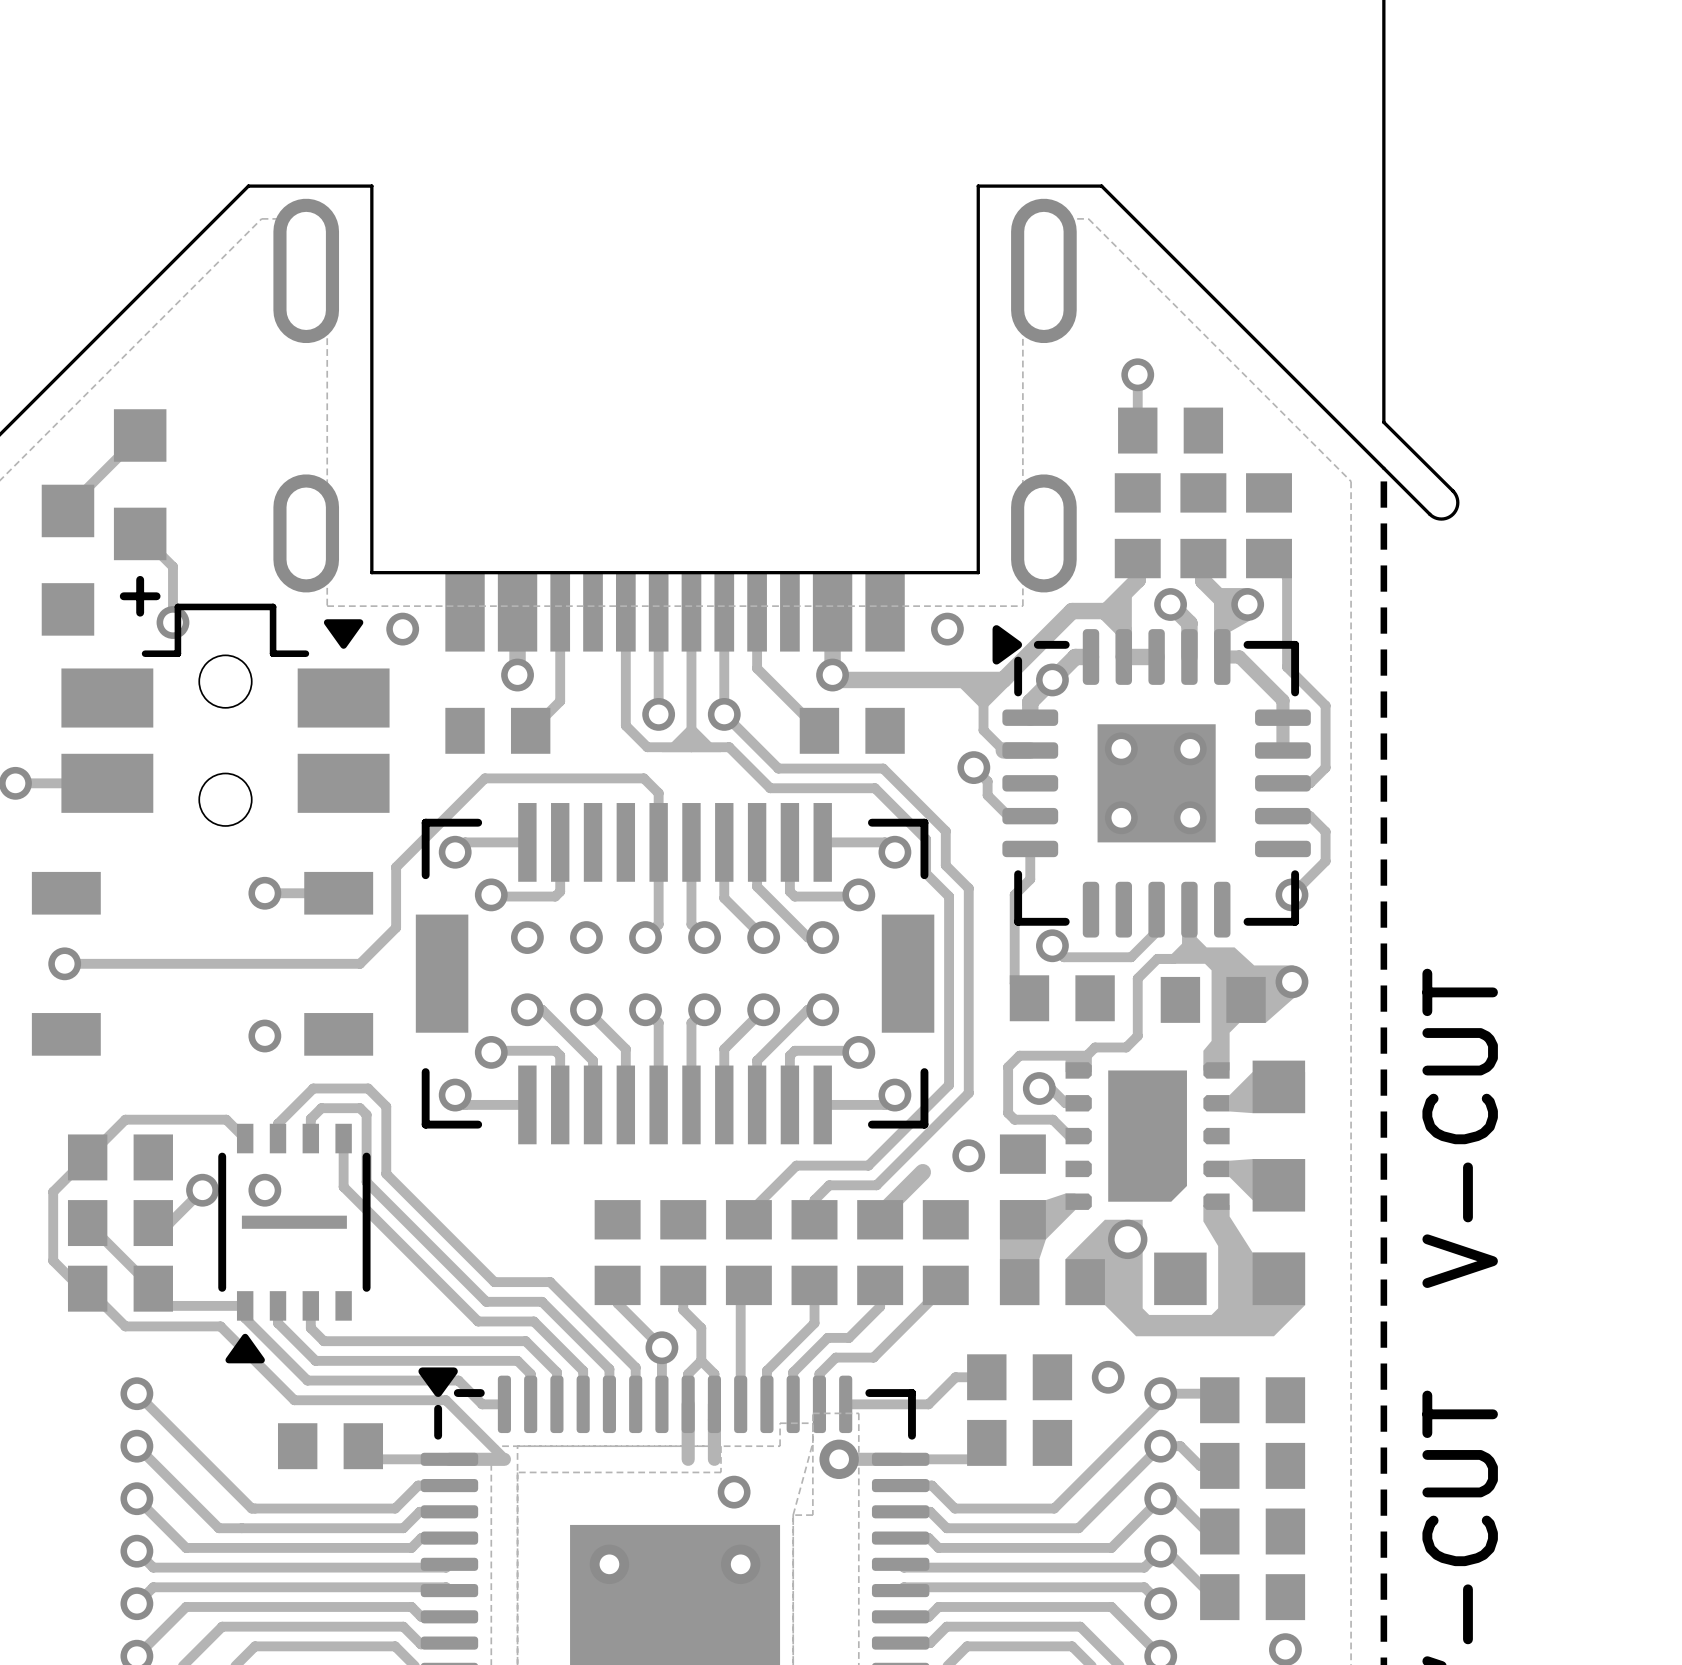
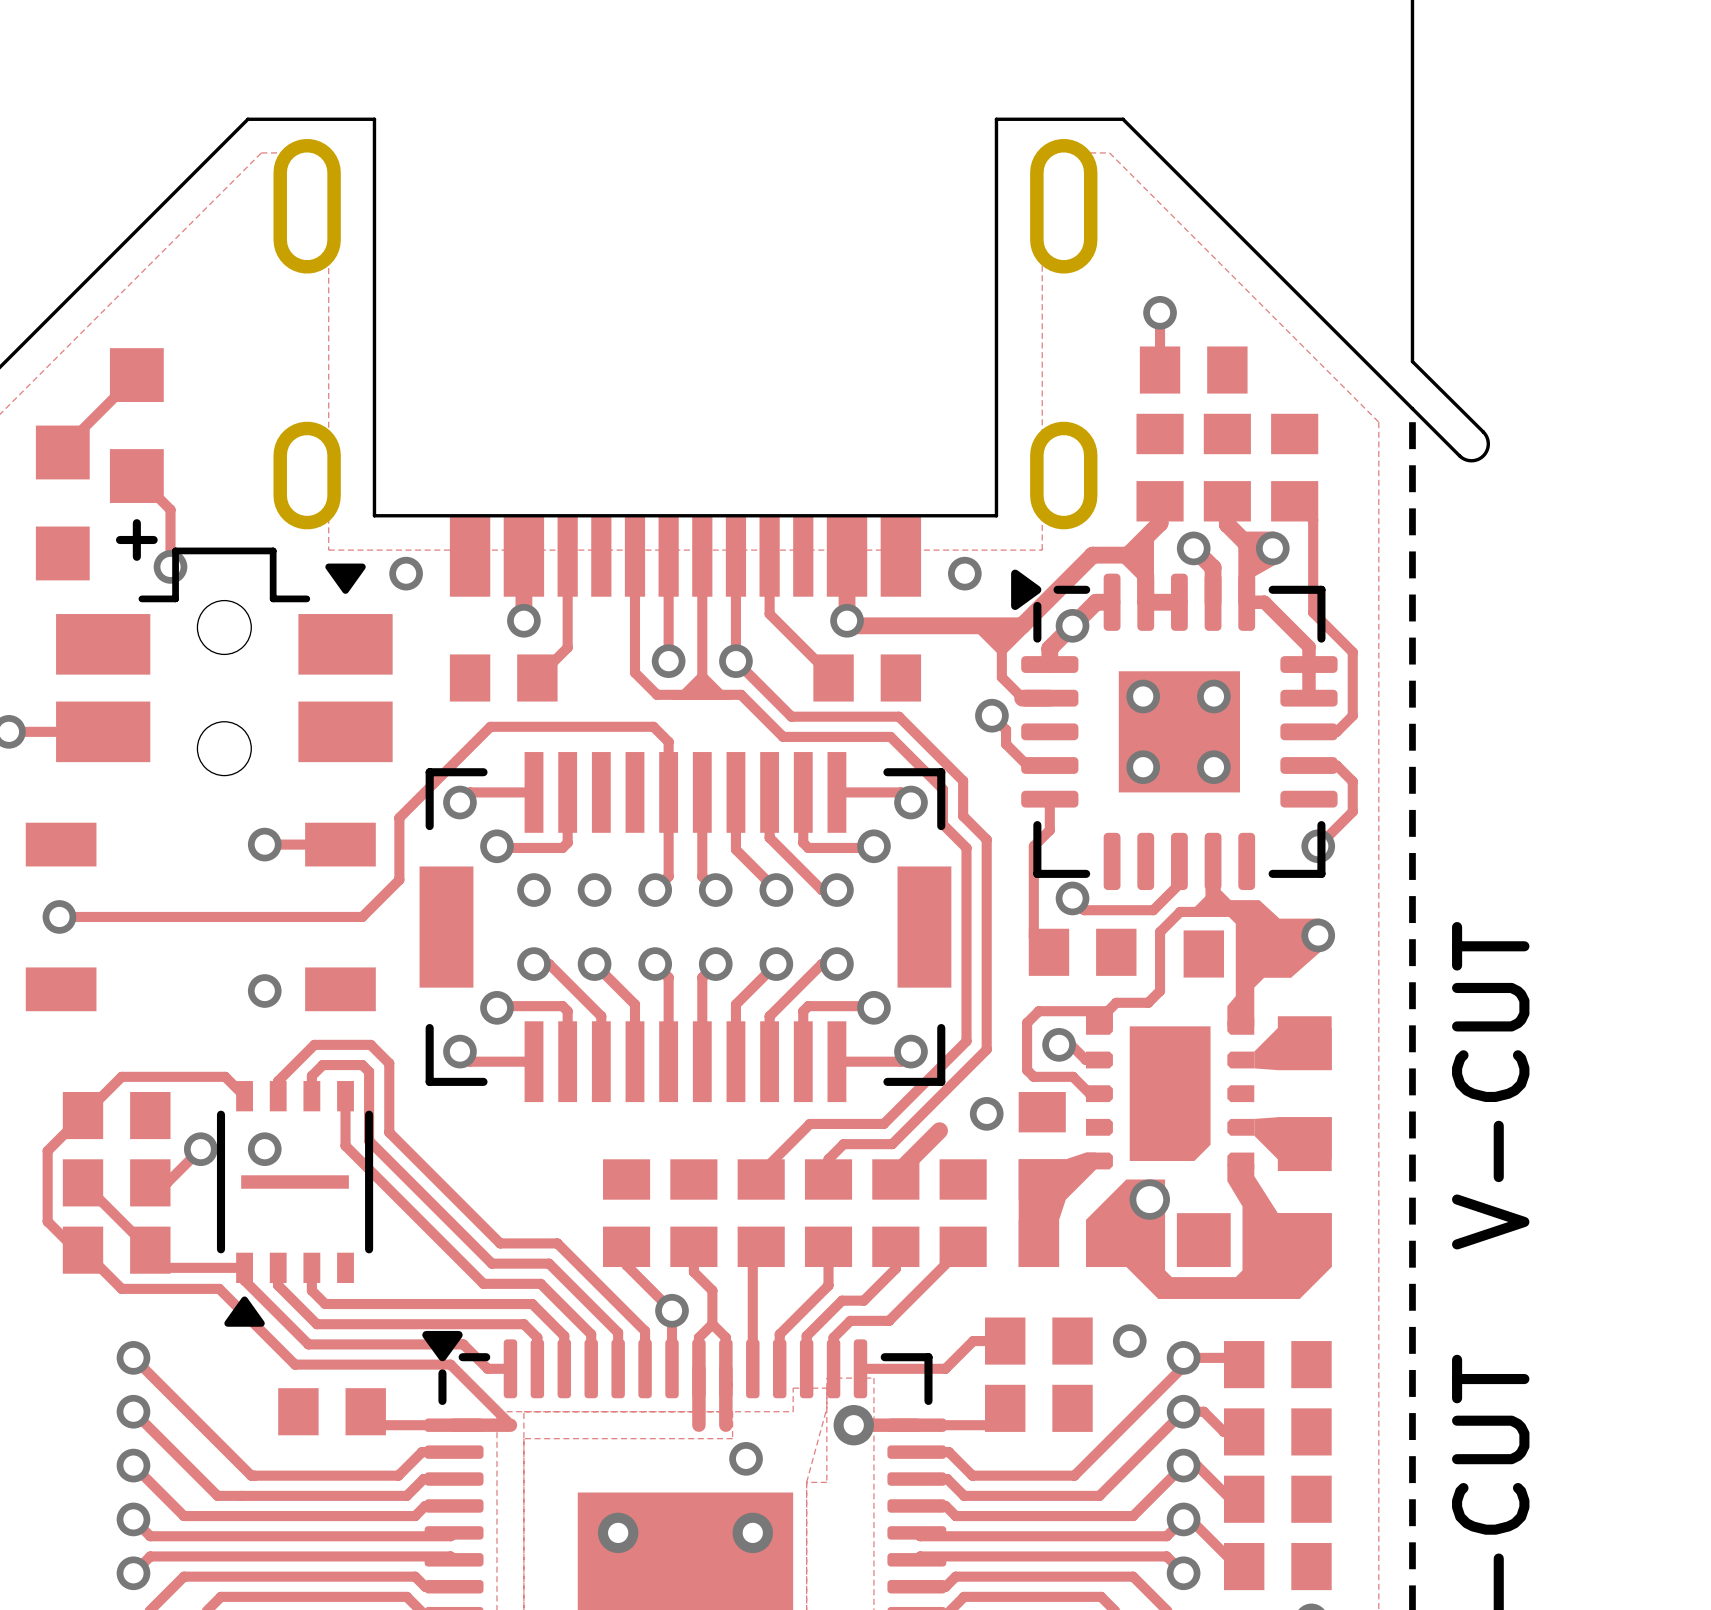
part footprint: [273, 198, 1077, 652] -> [273, 138, 1098, 597]

